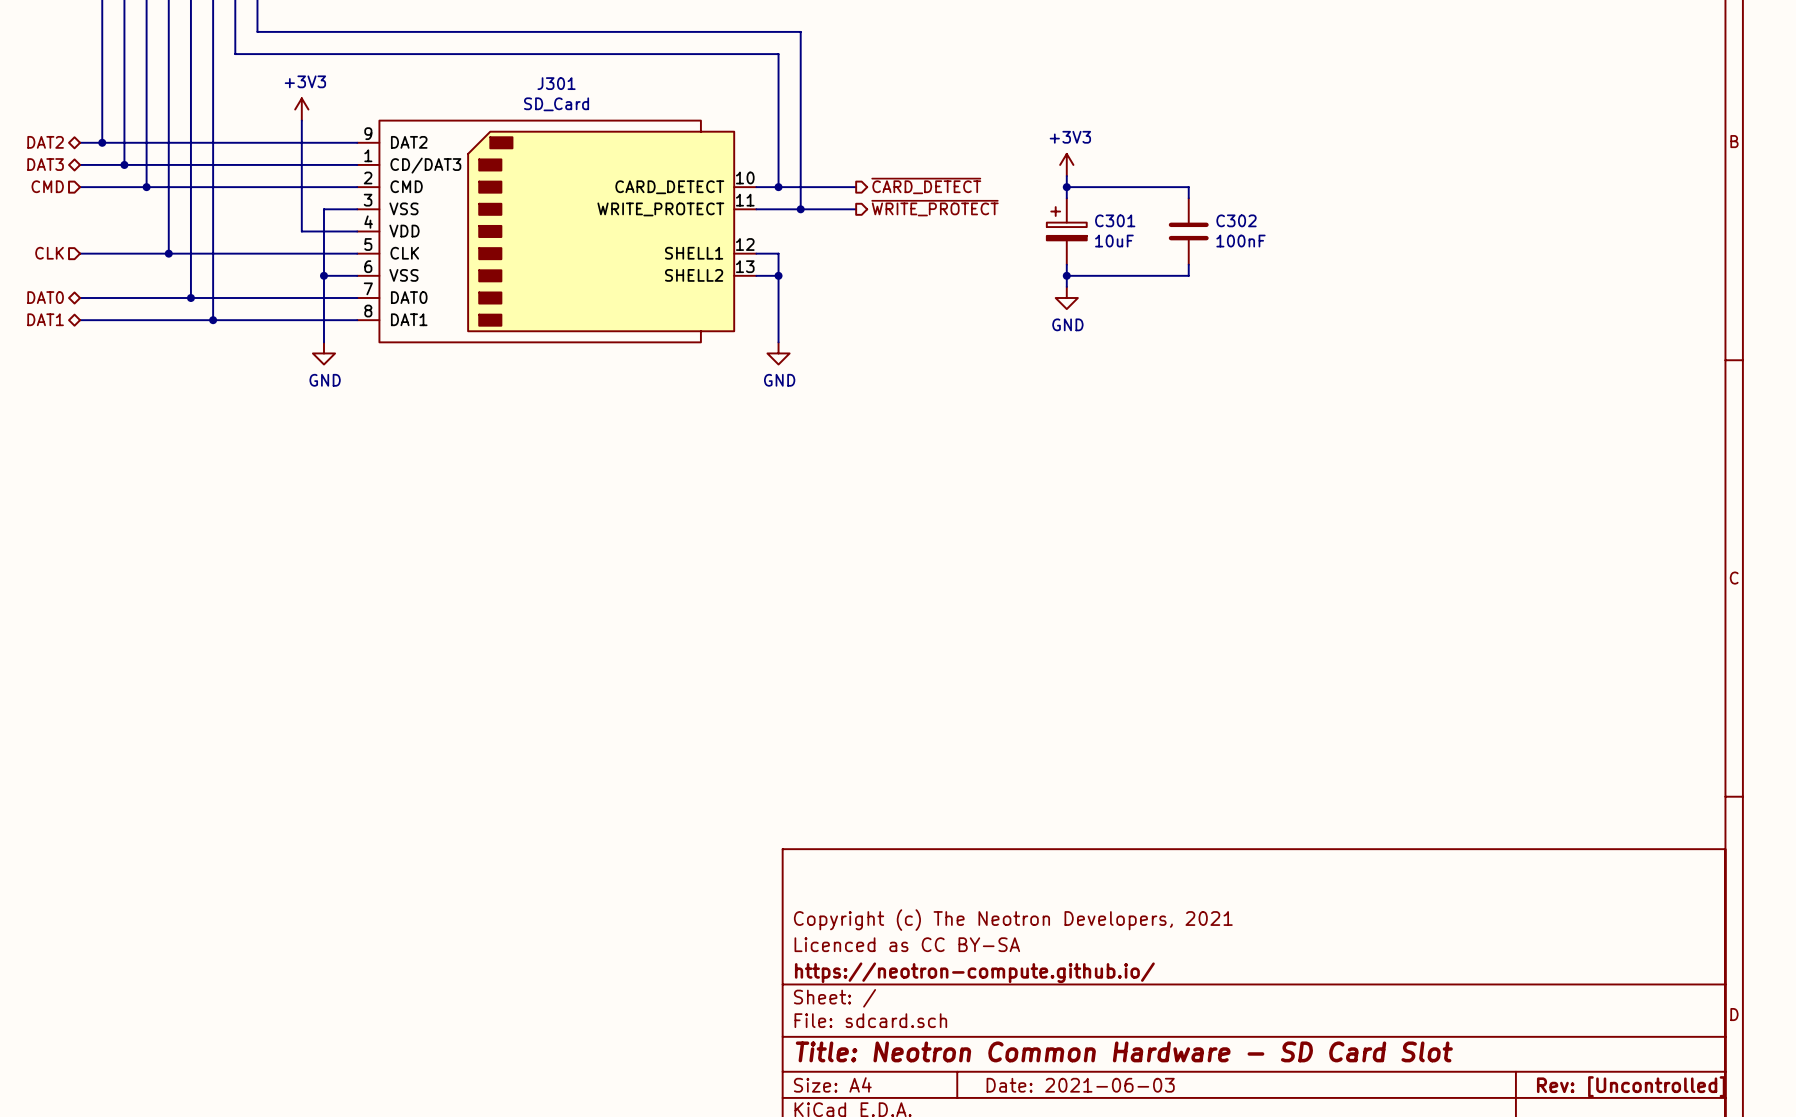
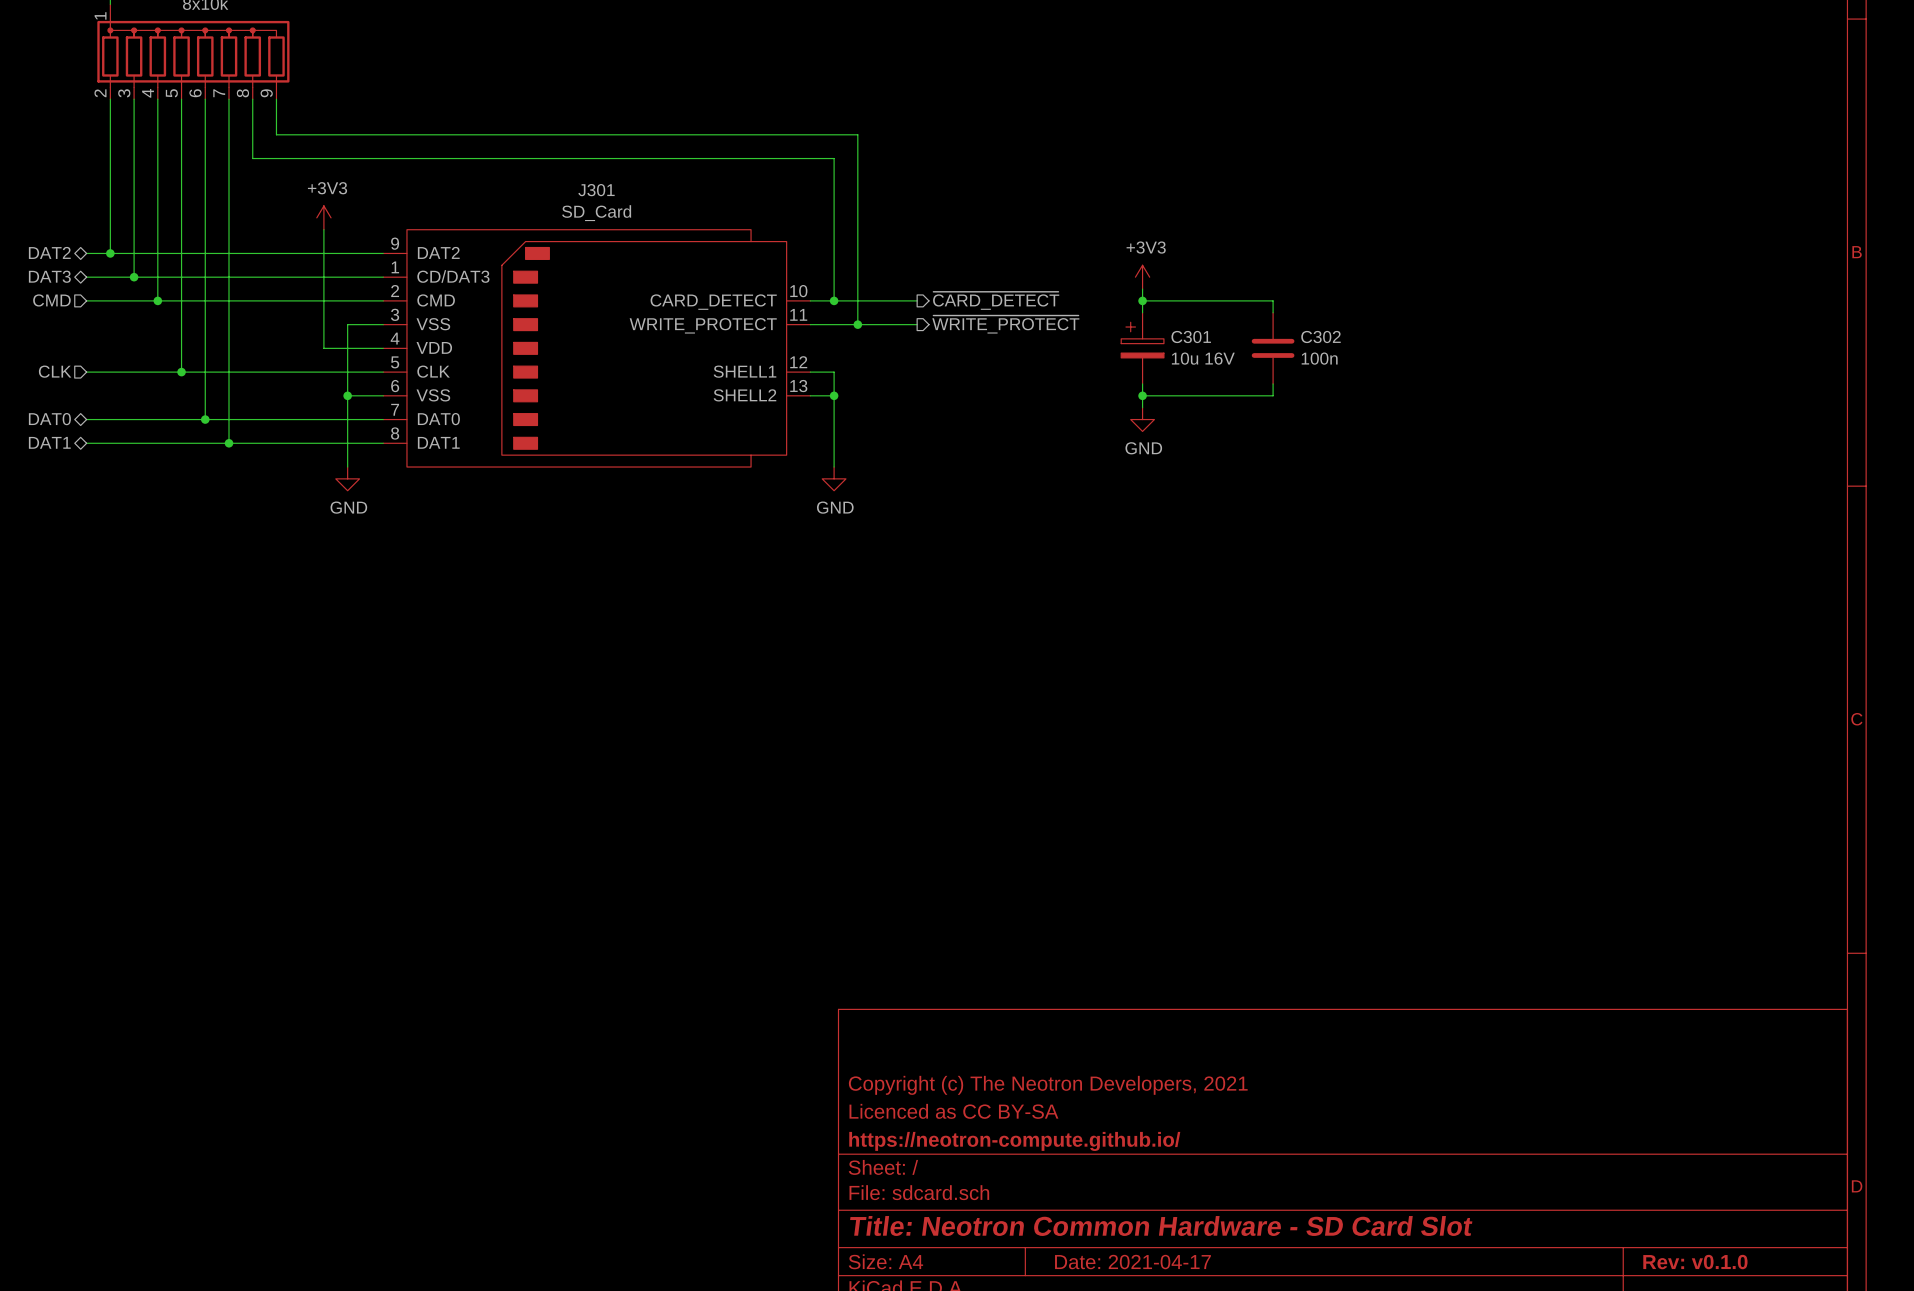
C301 value: 10uF (1114, 241) -> 10u 16V (1203, 358)
C302 value: 100nF (1240, 241) -> 100n (1319, 358)
title block: Date: 2021-06-03 (1080, 1085) -> Date: 2021-04-17 (1132, 1262)
title block: Rev: [Uncontrolled] (1631, 1086) -> Rev: v0.1.0 (1695, 1262)

